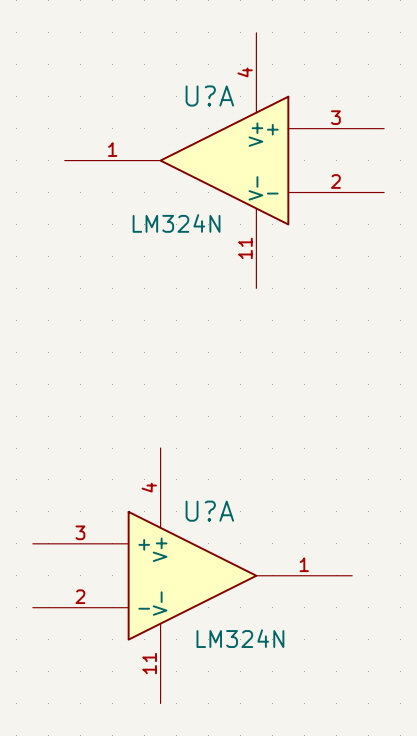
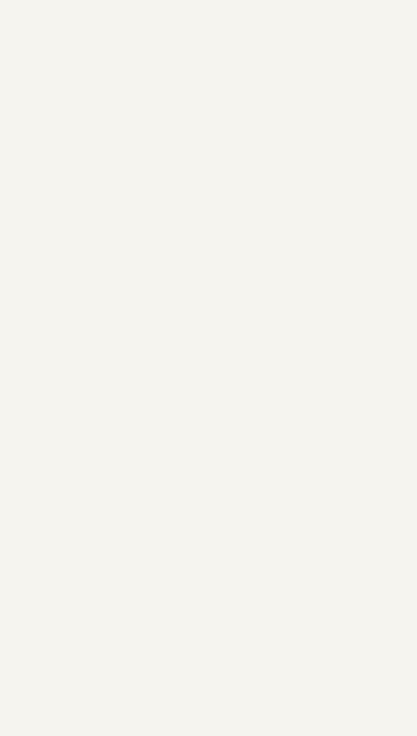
U?A: LM324N (224, 160) -> none
U?A: LM324N (192, 575) -> none

